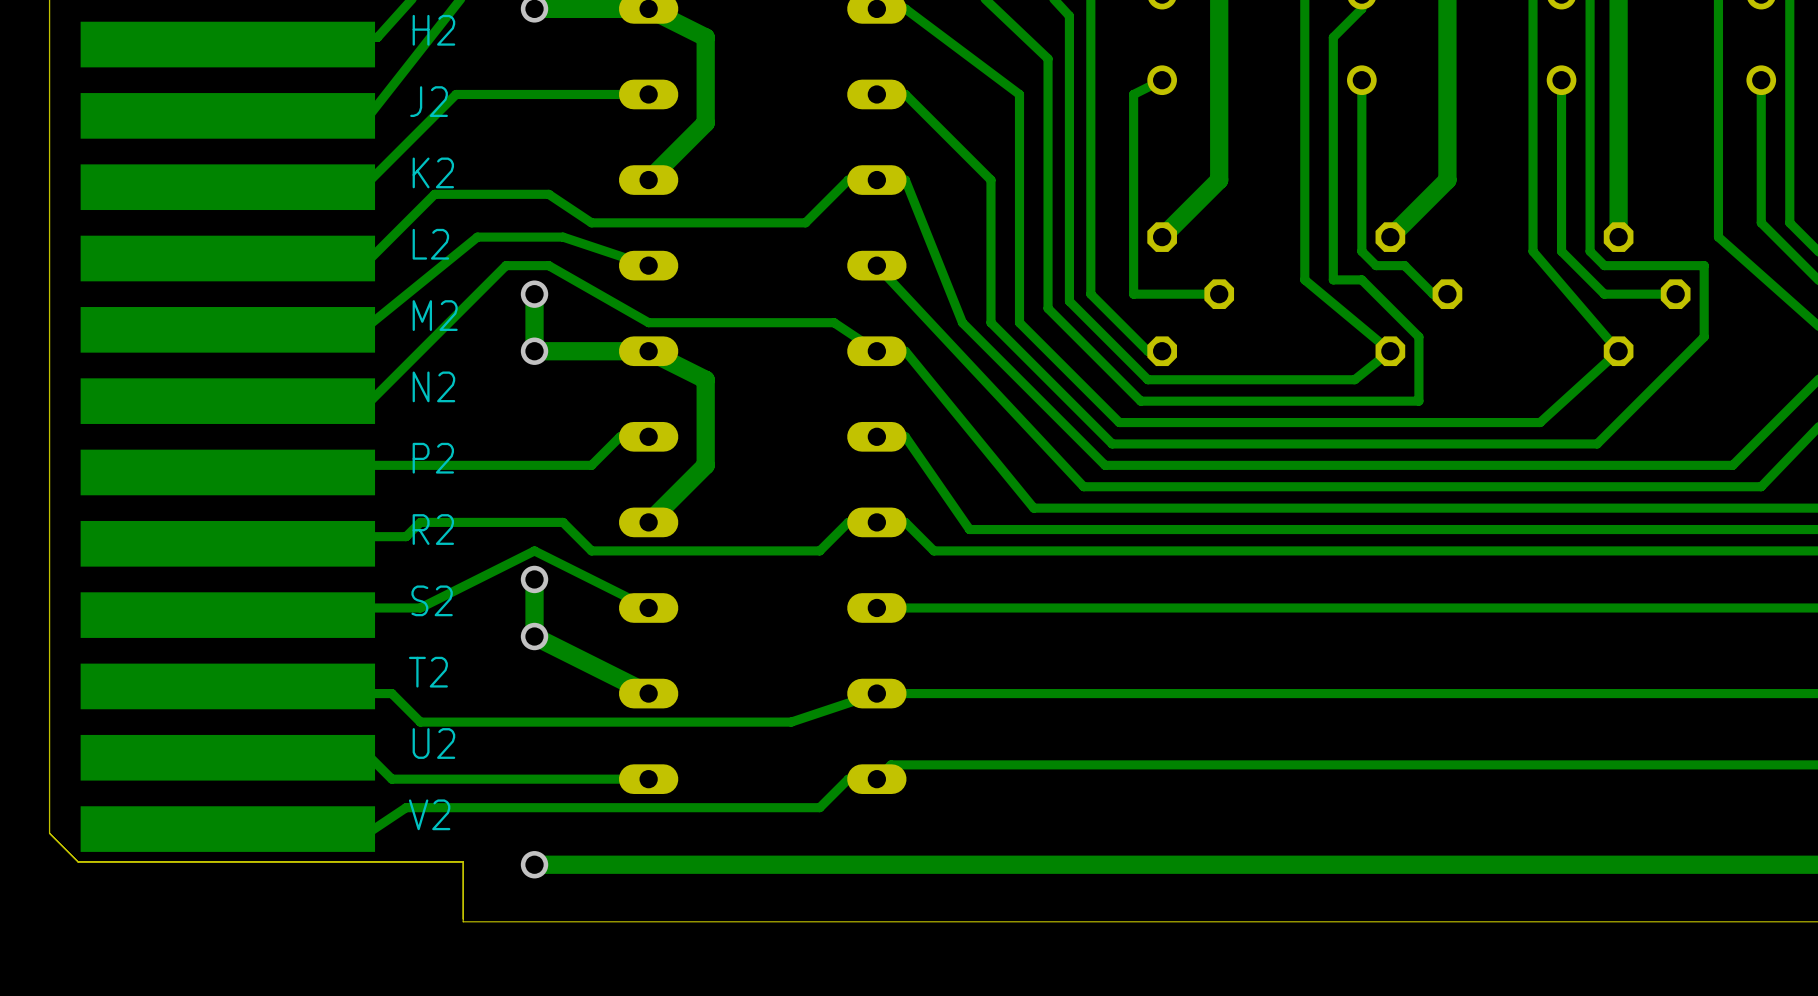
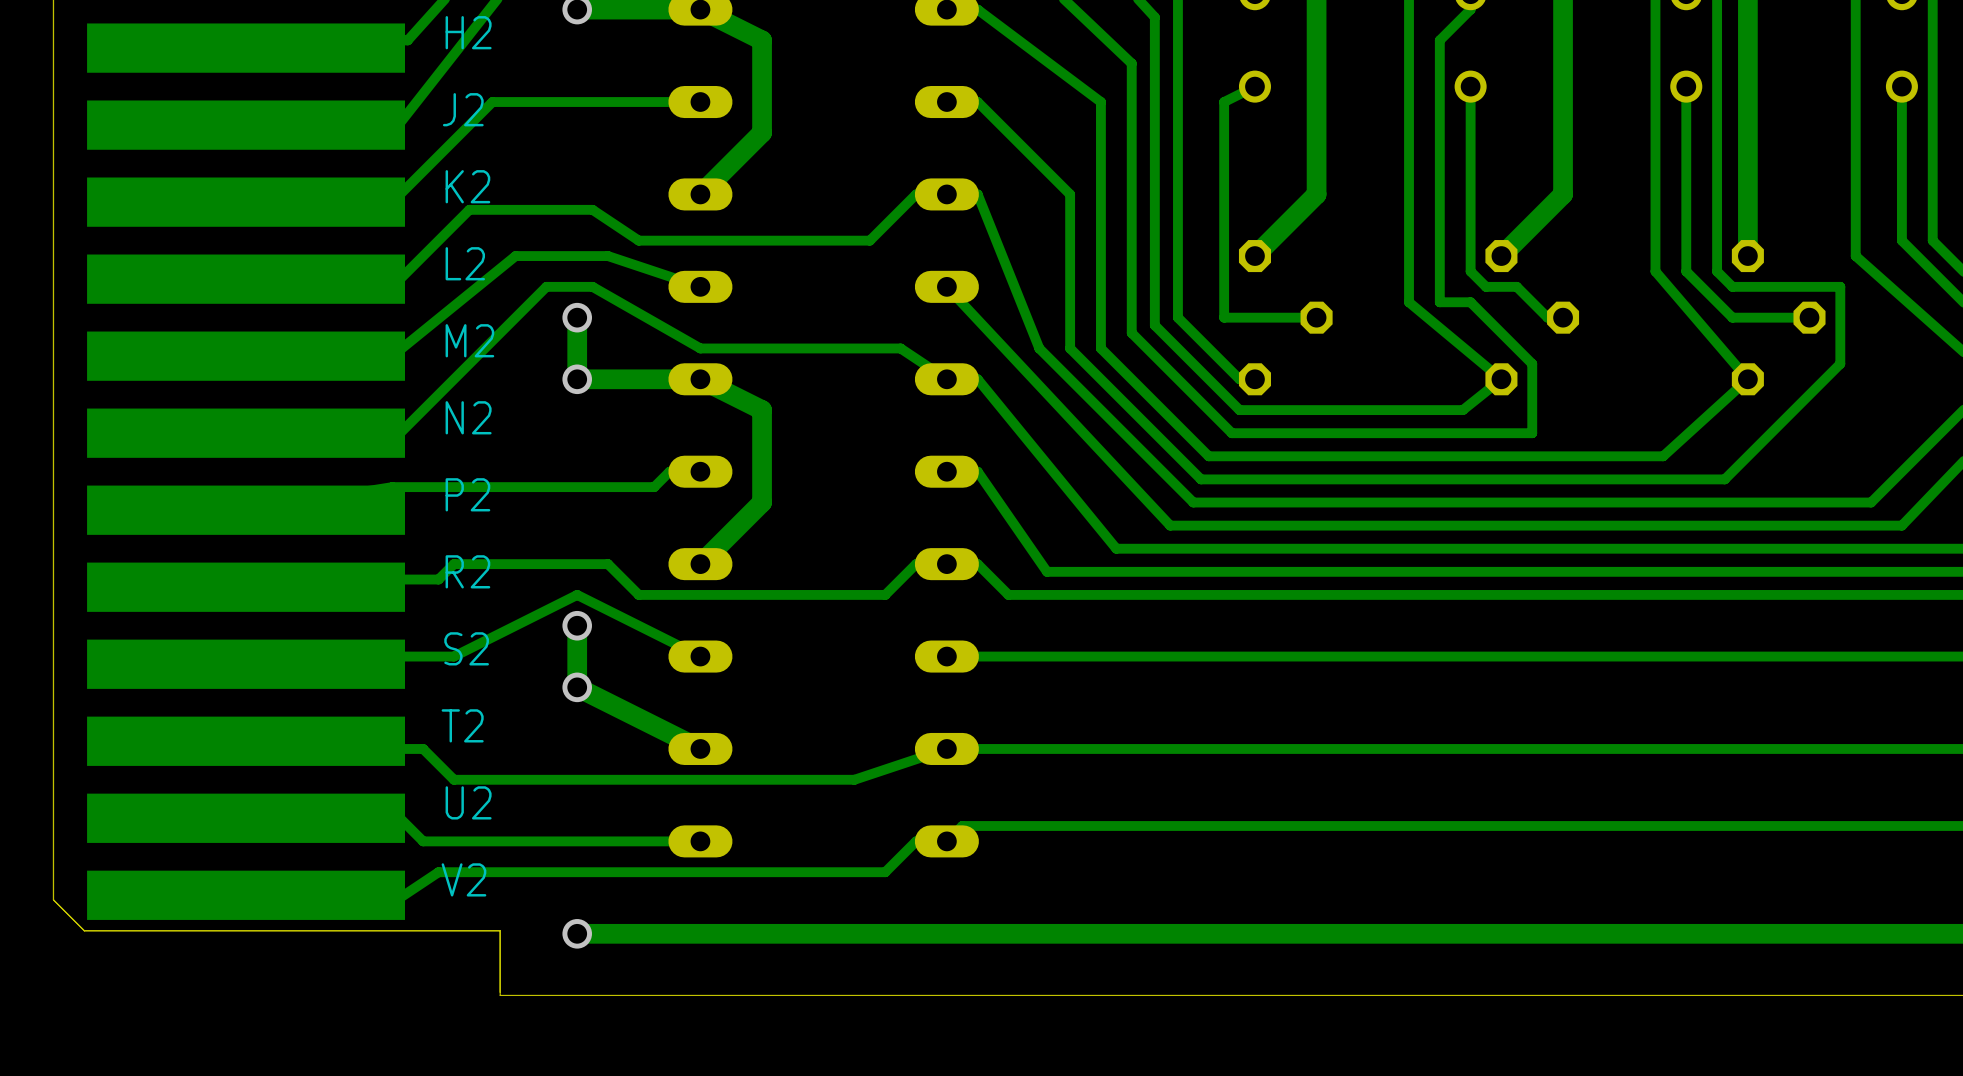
track: (605, 451) (591, 465) (349, 465) (227, 472) -> (654, 487) (392, 487) (246, 510)

